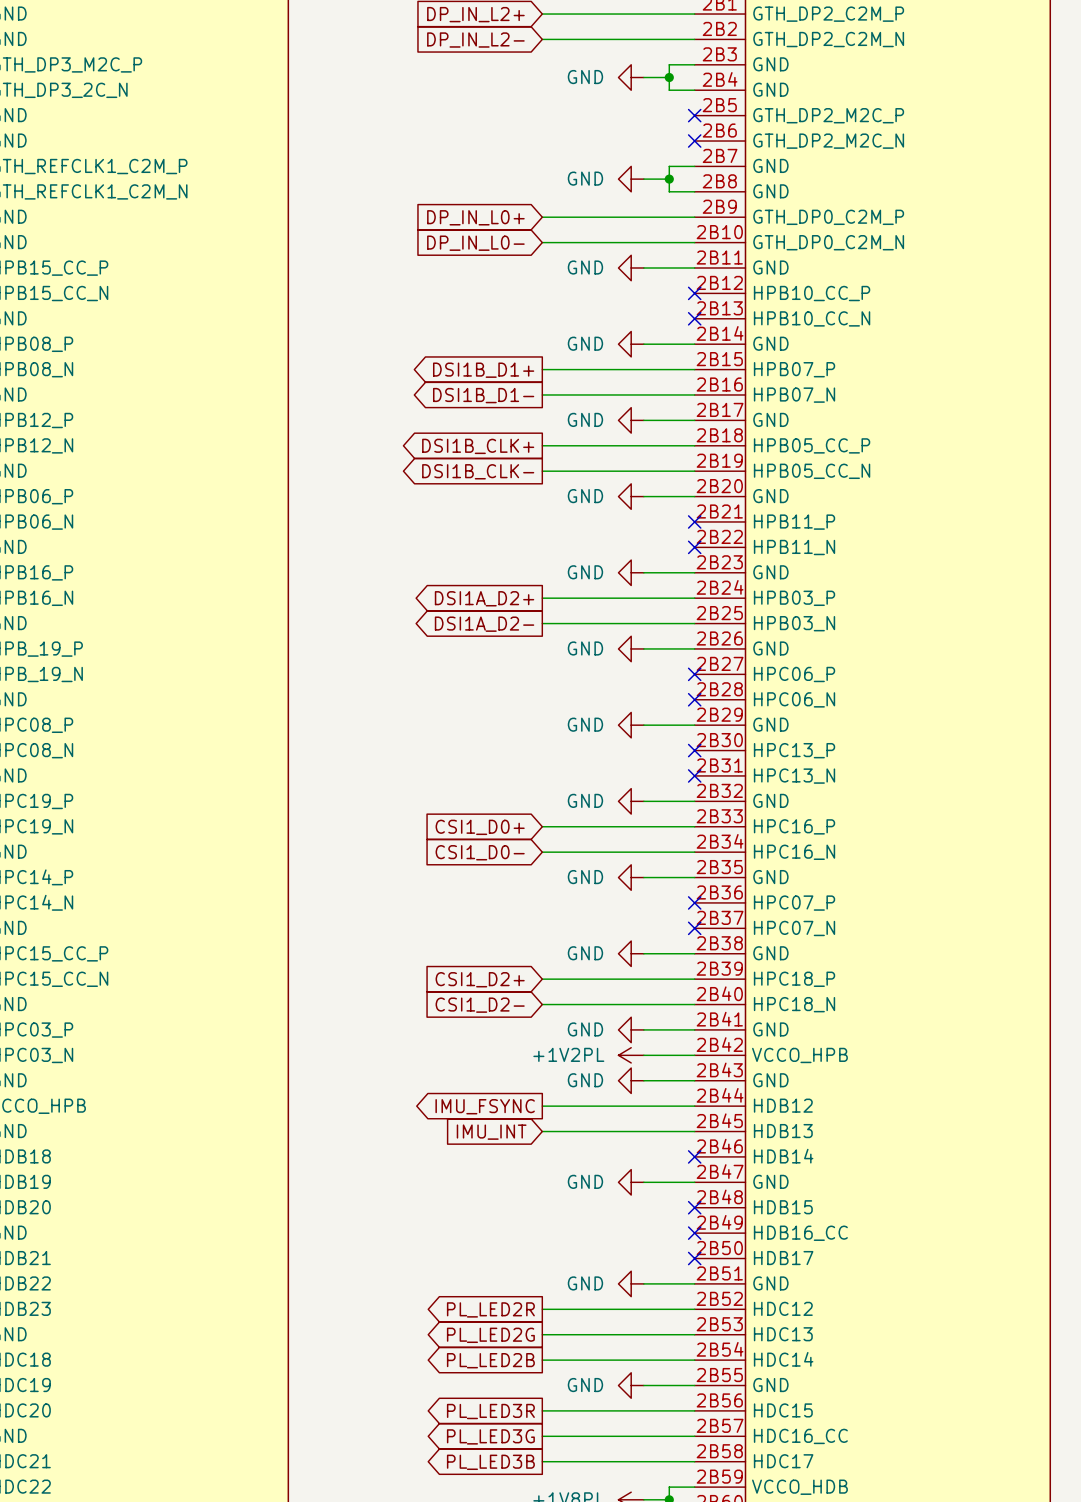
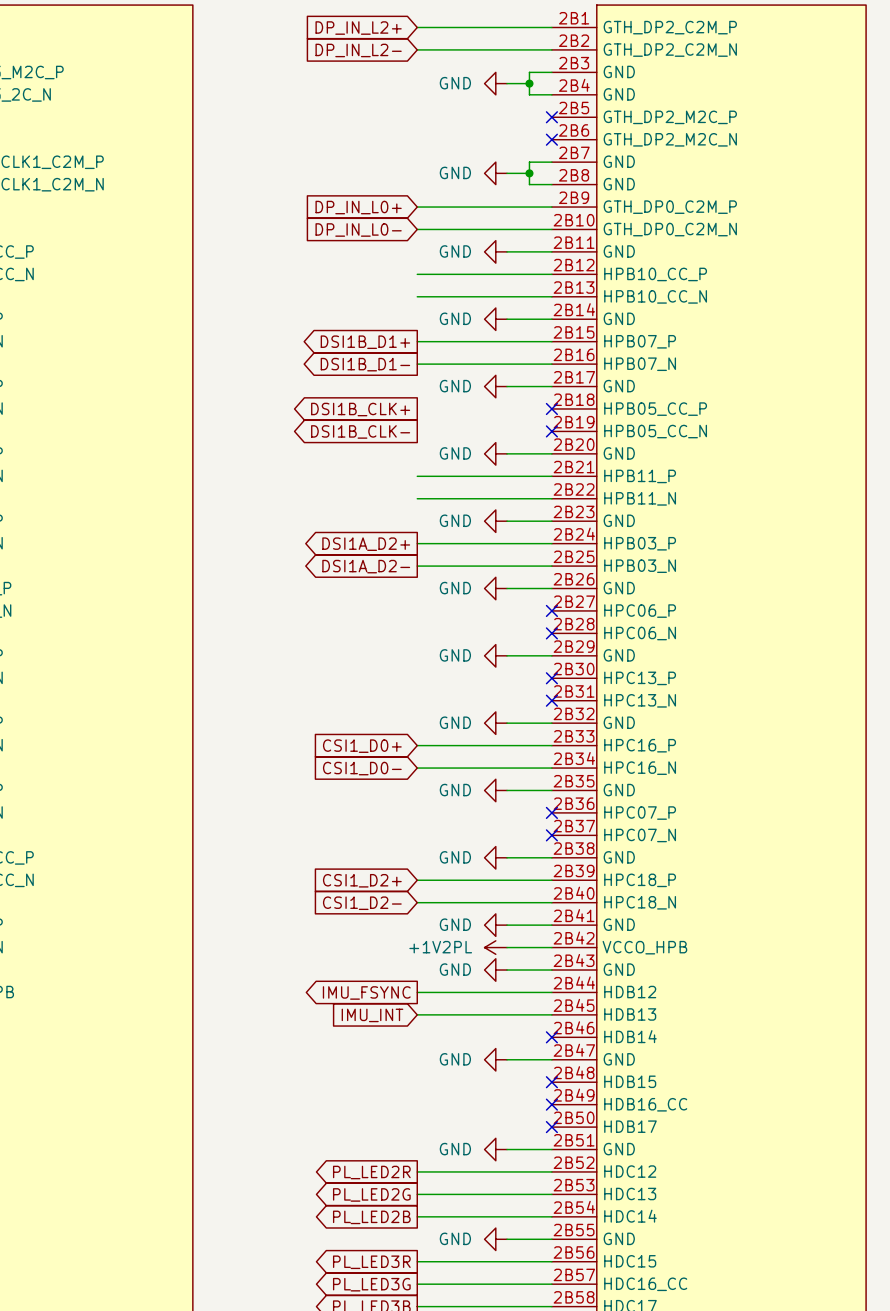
wire: none -> (417, 274) (551, 274)
no-connect mark: (694, 293) -> none
wire: none -> (417, 296) (551, 296)
no-connect mark: (694, 318) -> none
wire: (542, 445) (694, 445) -> (417, 476) (551, 476)
no-connect mark: none -> (551, 408)
wire: (542, 471) (694, 471) -> (417, 498) (551, 498)
no-connect mark: none -> (551, 431)
no-connect mark: (694, 521) -> none
no-connect mark: (694, 547) -> none

